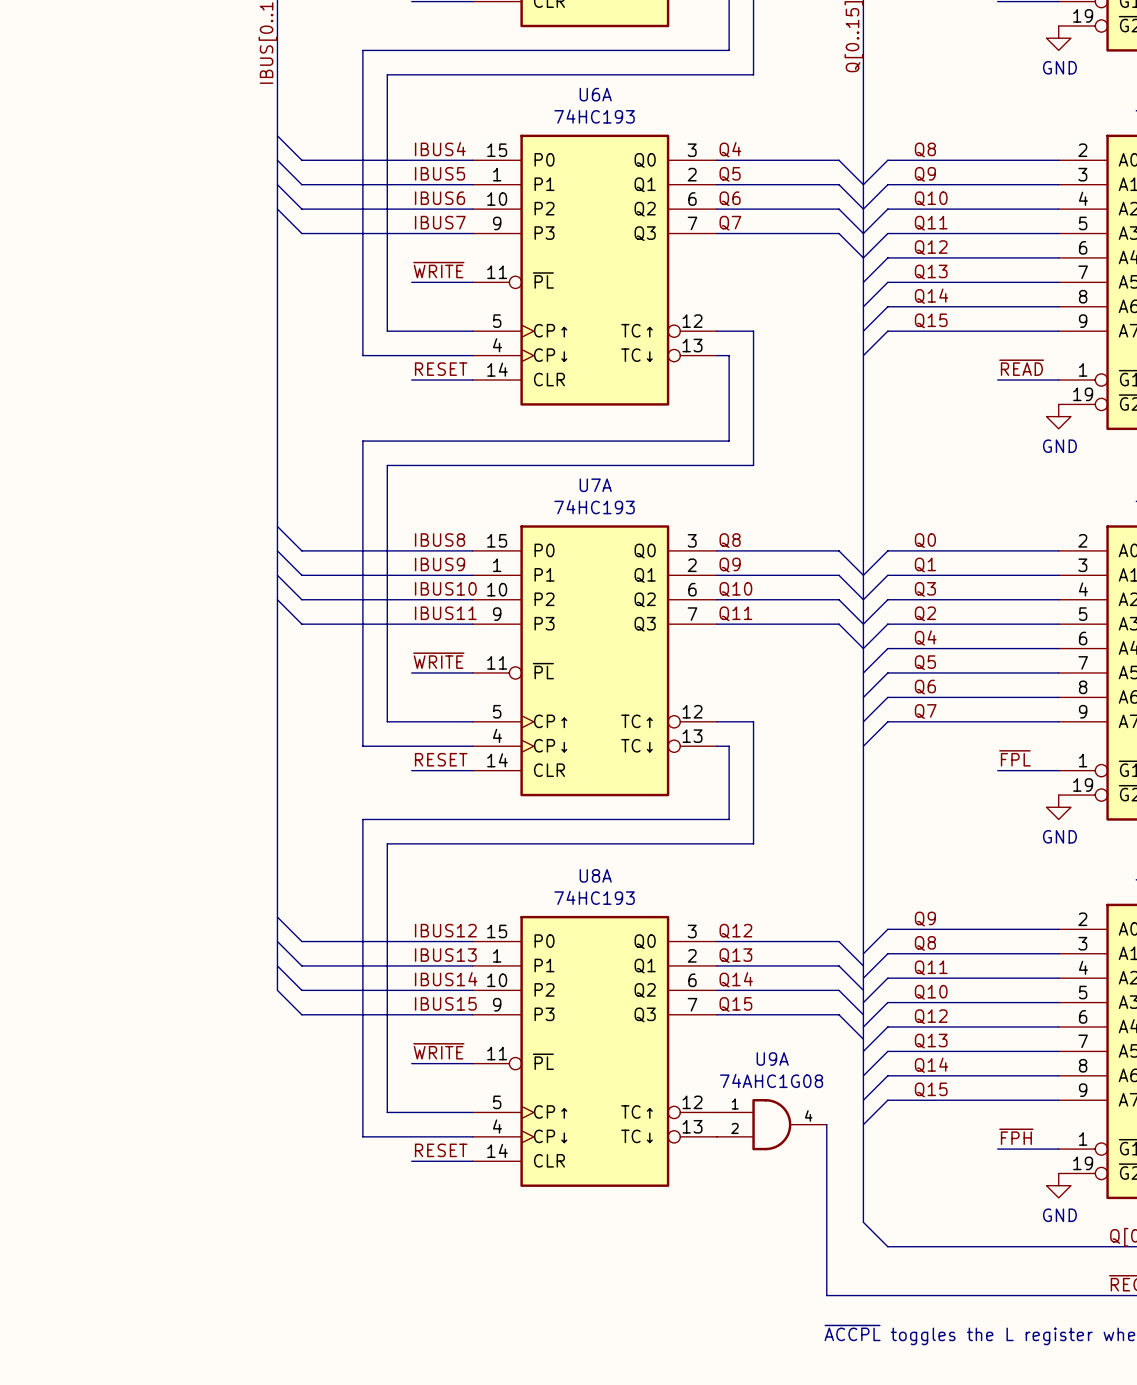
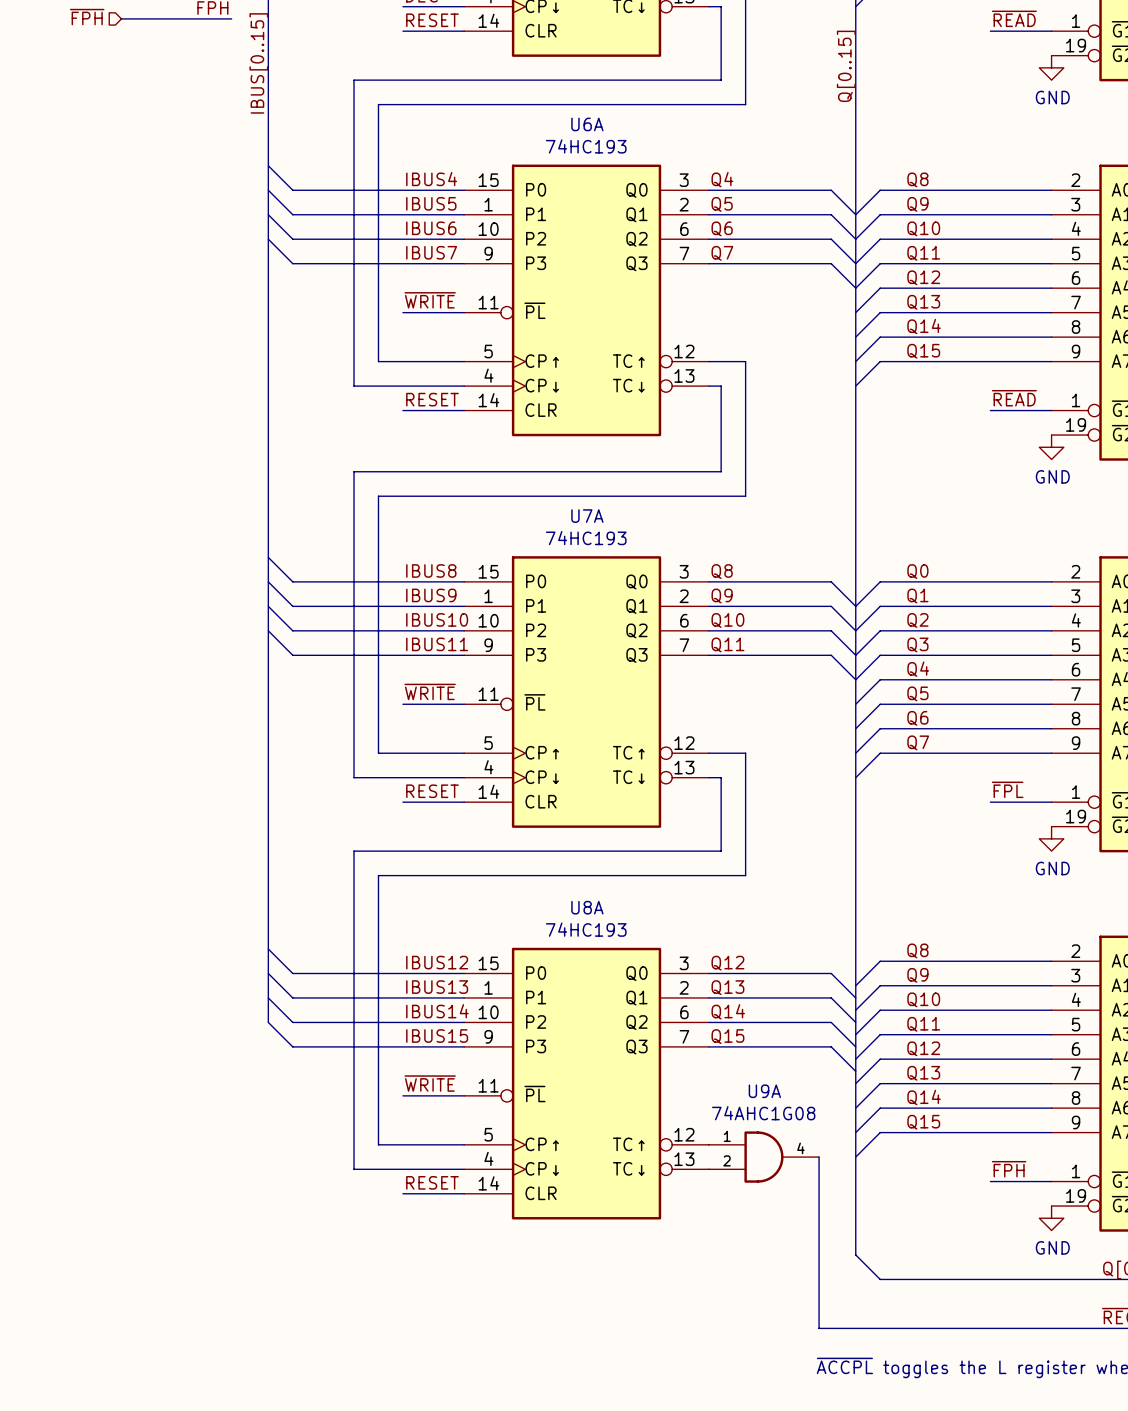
label: Q3 (925, 589) -> Q2 (917, 620)
label: Q2 (925, 613) -> Q3 (917, 644)
label: Q9 (925, 919) -> Q8 (917, 950)
label: Q8 (925, 943) -> Q9 (917, 975)
label: Q11 (931, 967) -> Q10 (923, 999)
label: Q10 (931, 992) -> Q11 (923, 1024)

